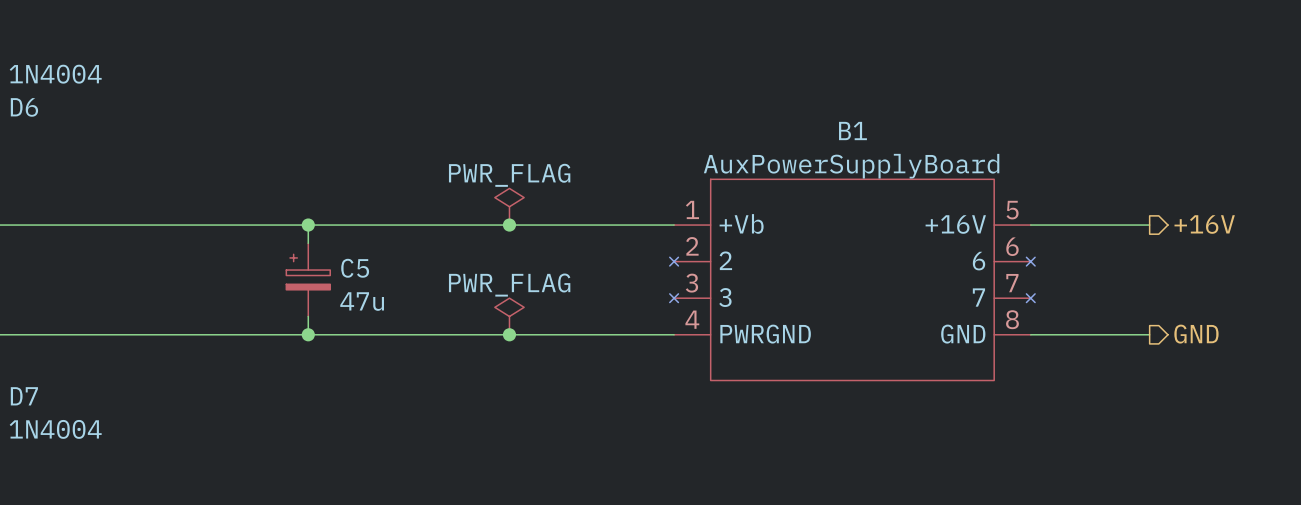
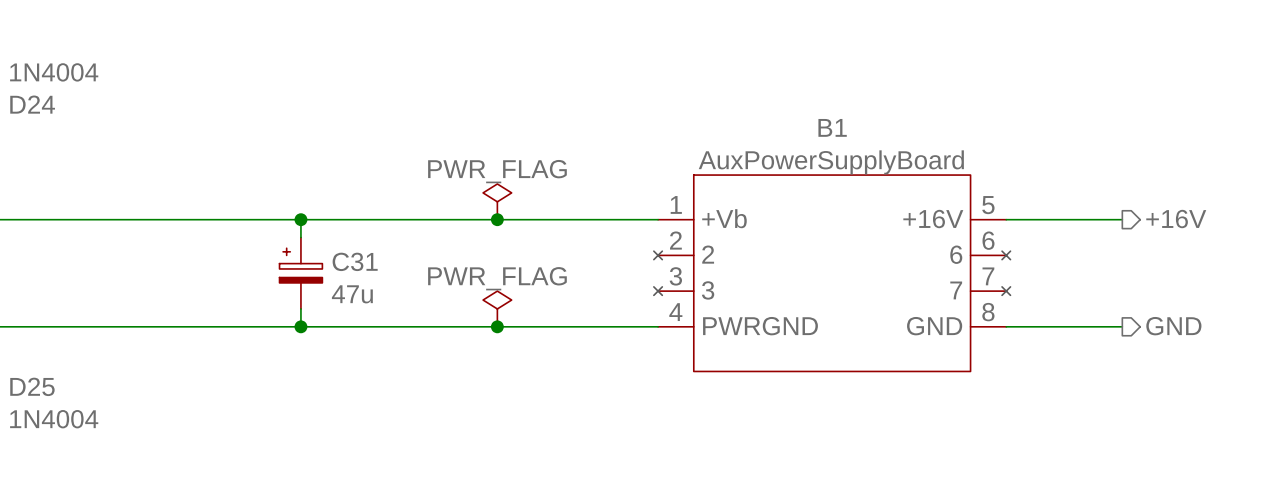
D6 name: D6 (24, 107) -> D24 (32, 104)
C5 name: C5 (355, 268) -> C31 (355, 261)
D7 name: D7 (24, 396) -> D25 (32, 386)

